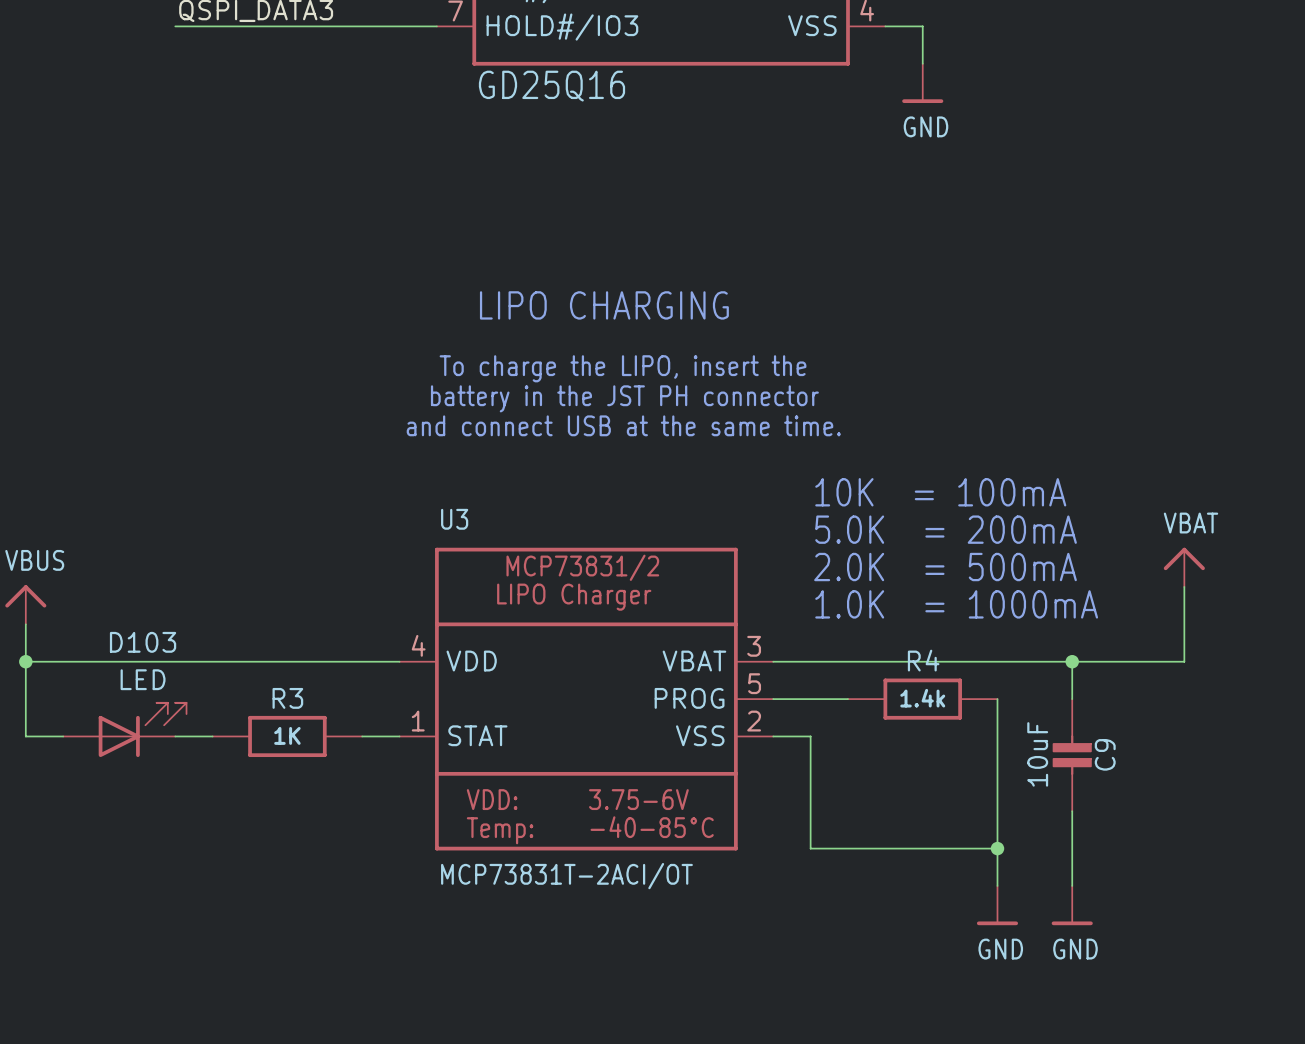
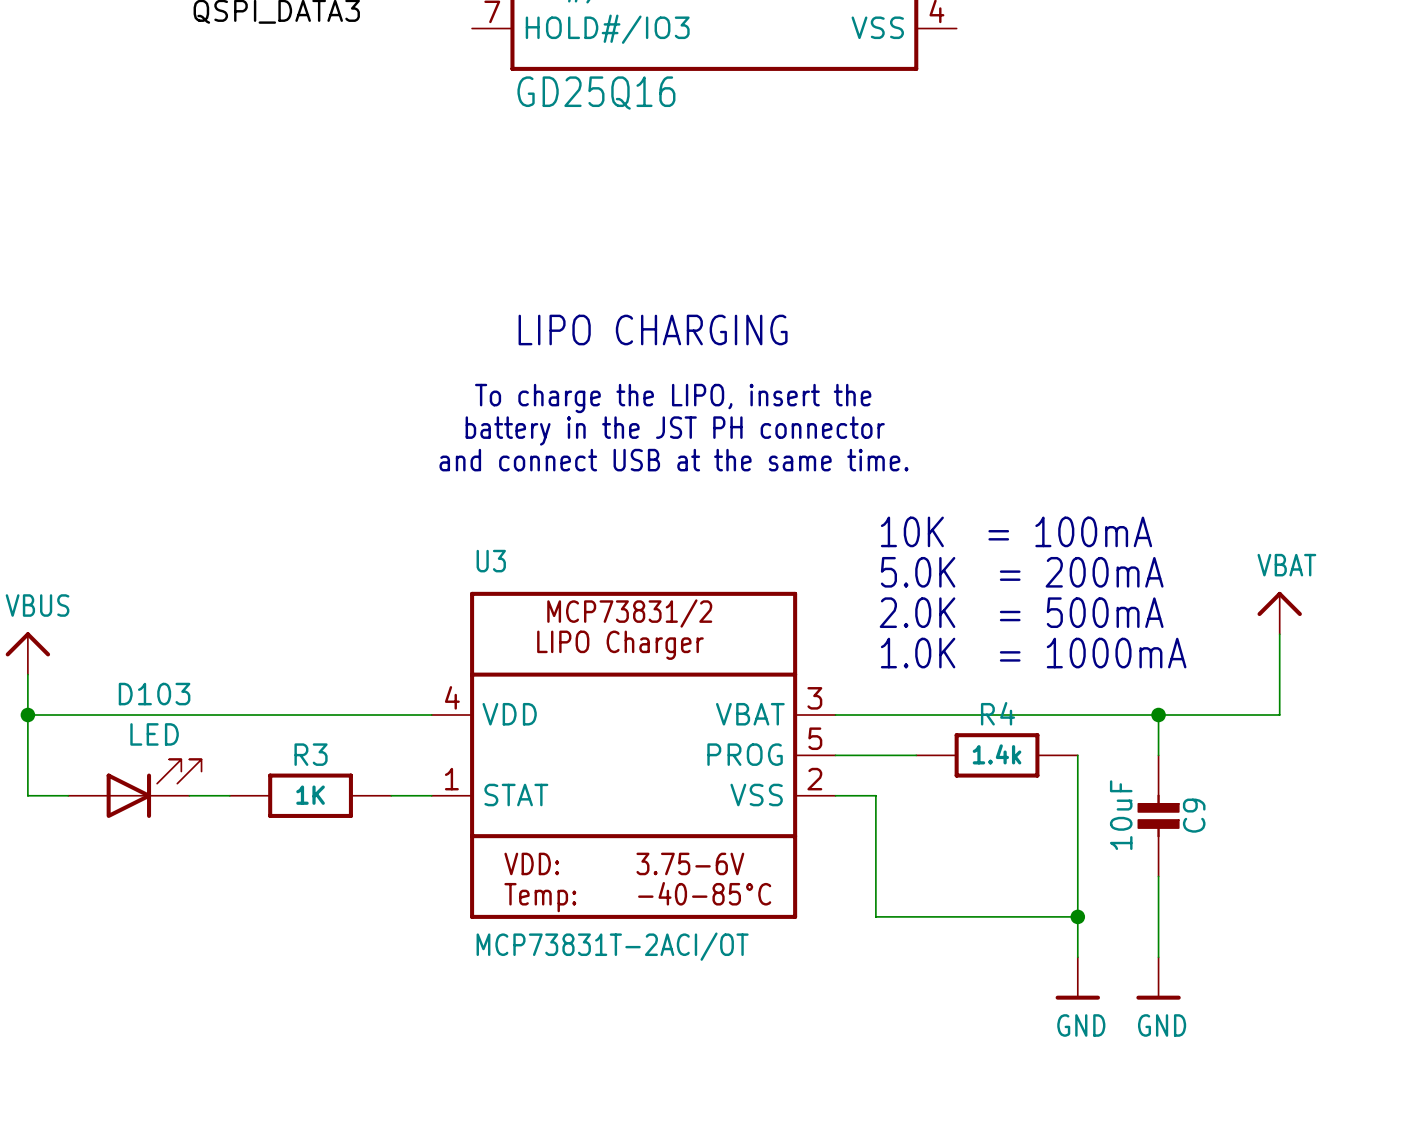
wire: (175, 26) (436, 26) -> none
wire: (885, 26) (922, 26) (922, 63) -> none
power symbol: GND (922, 83) -> none

